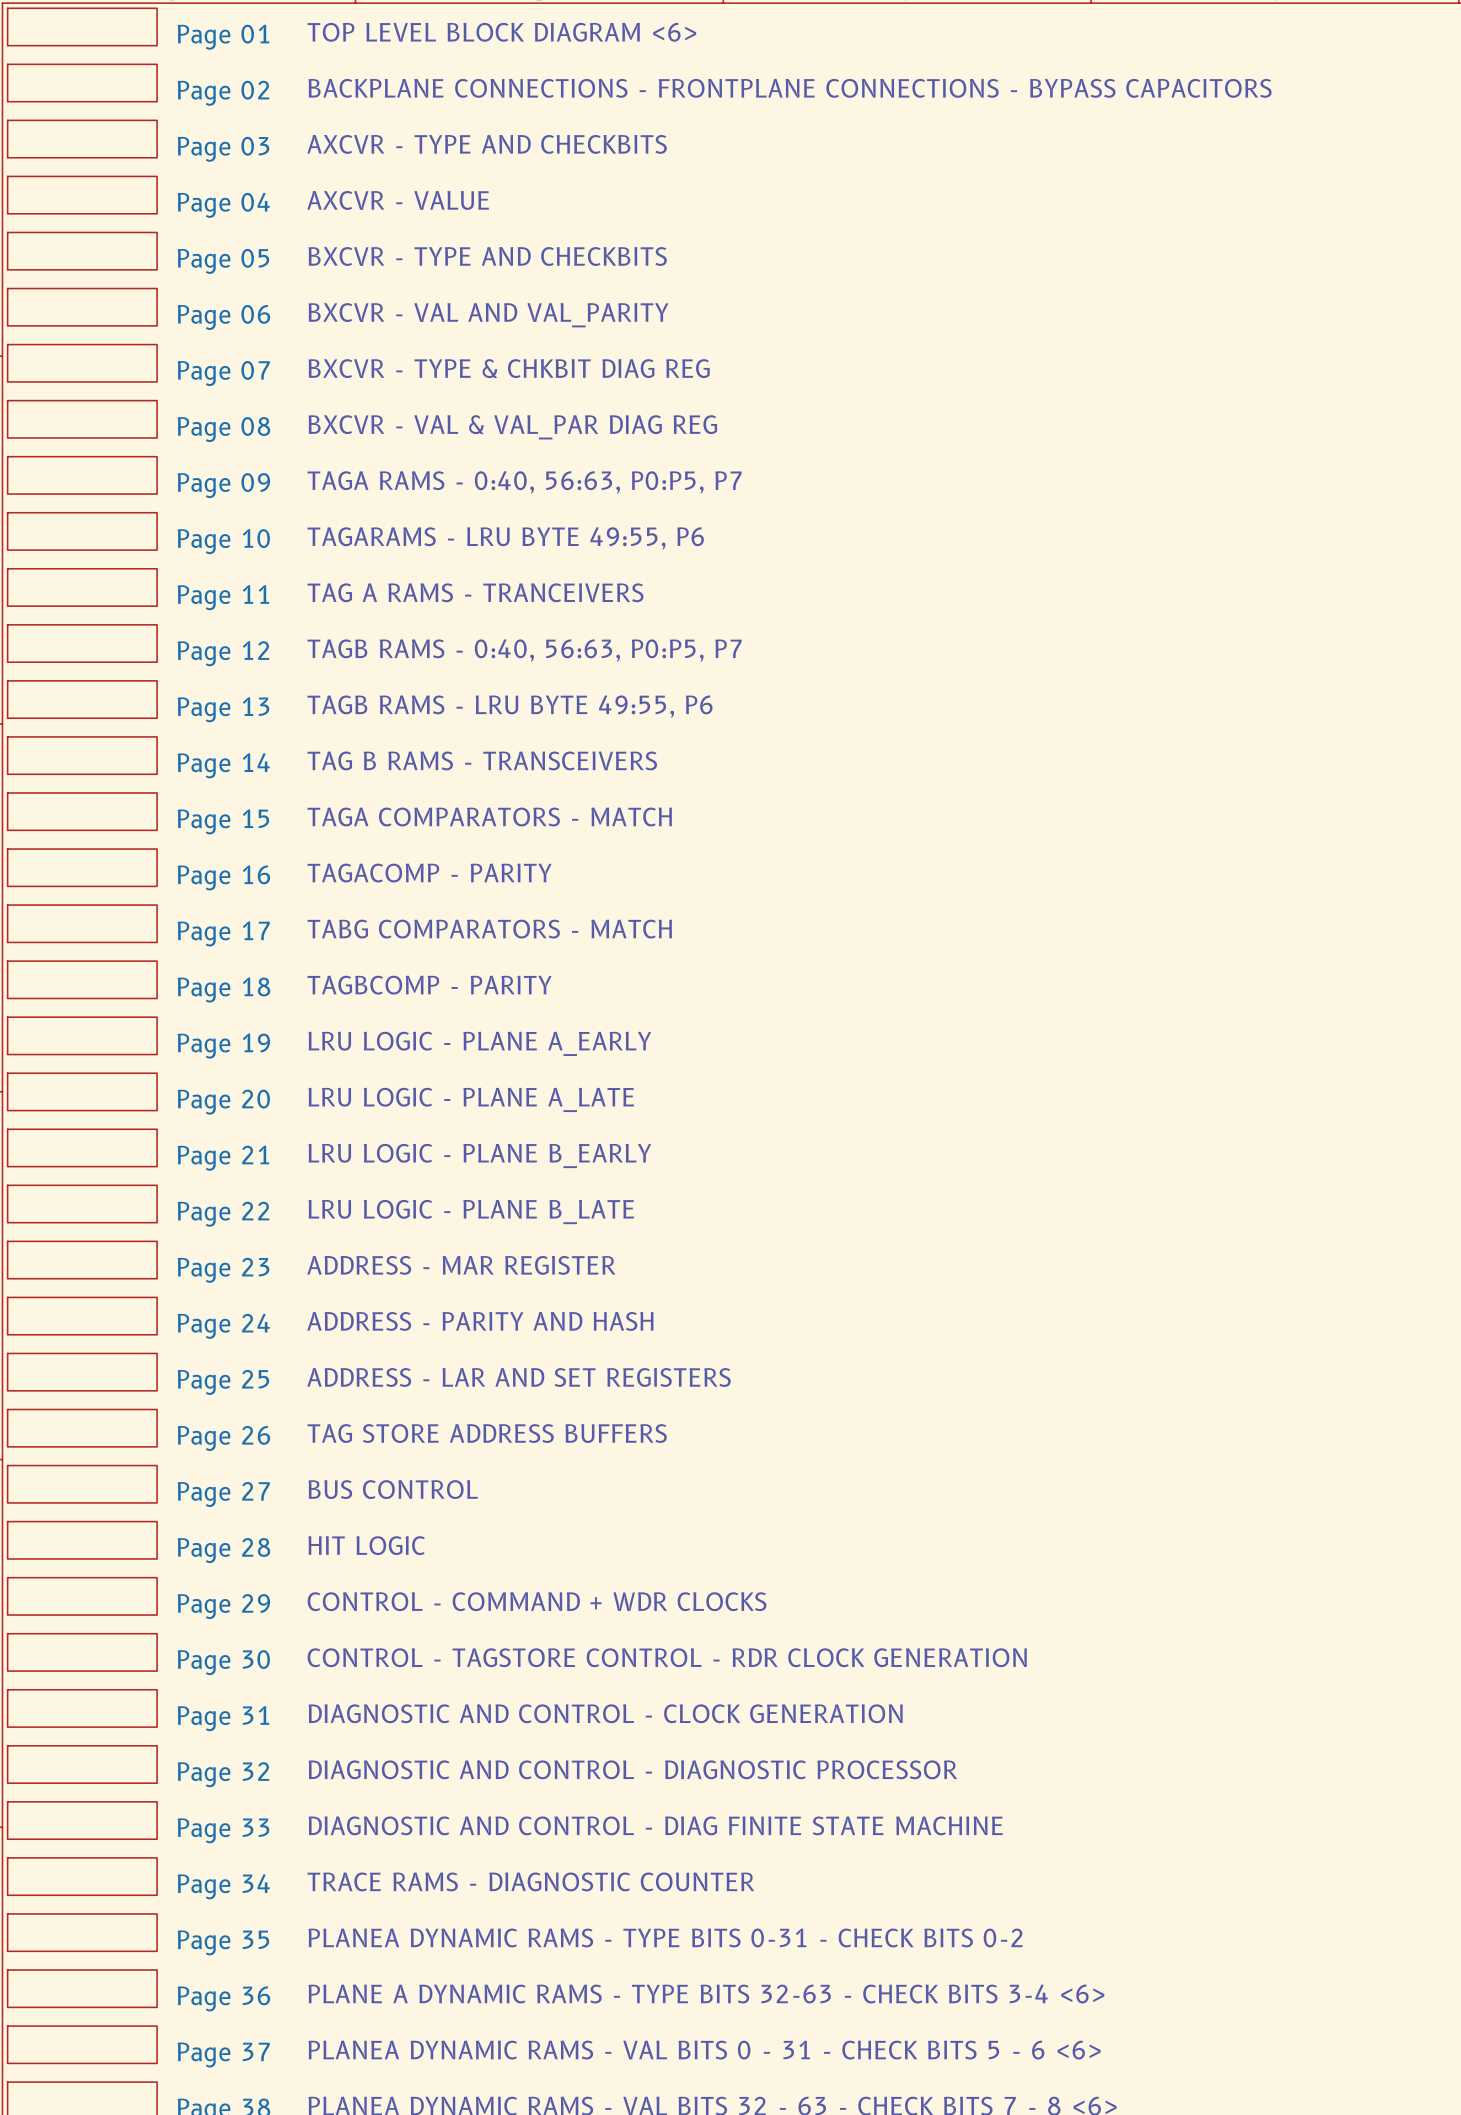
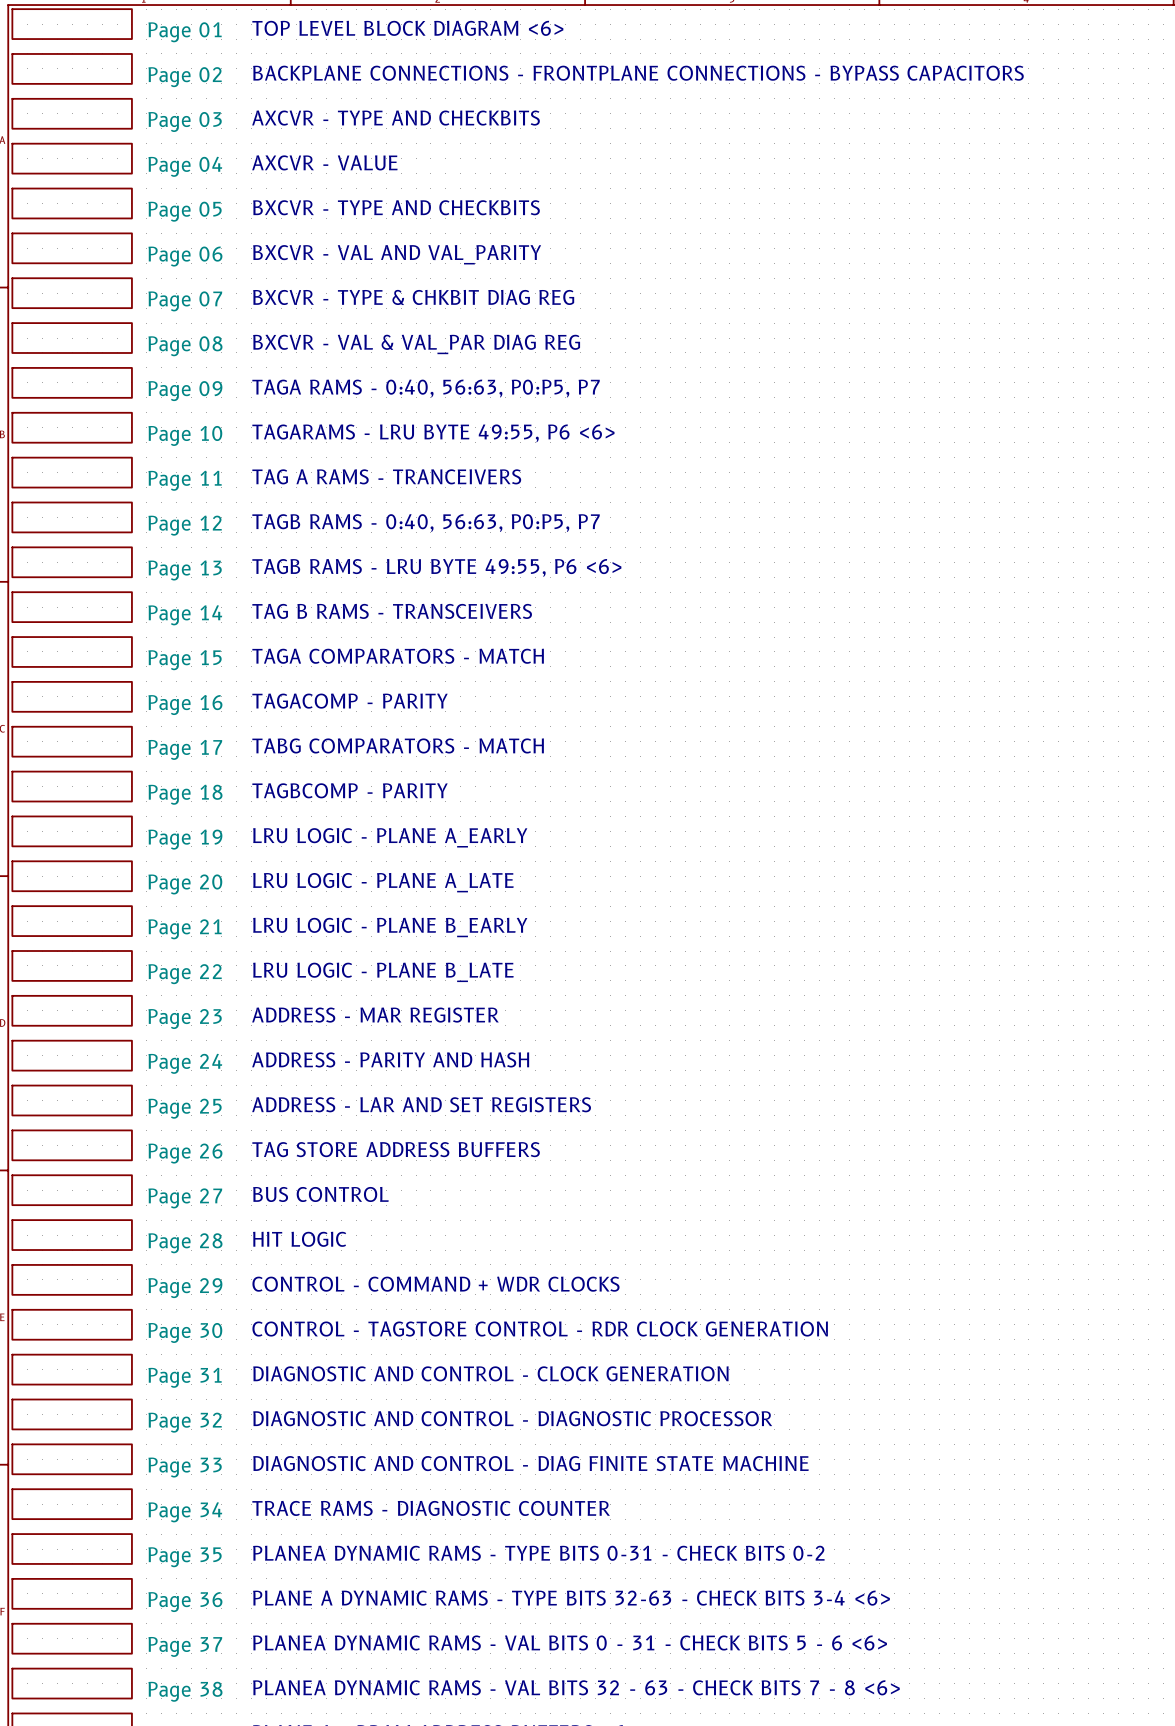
text: TAGARAMS - LRU BYTE 49:55, P6 (505, 538) -> TAGARAMS - LRU BYTE 49:55, P6 <6> (433, 433)
text: TAGB RAMS - LRU BYTE 49:55, P6 (510, 706) -> TAGB RAMS - LRU BYTE 49:55, P6 <6> (436, 567)

